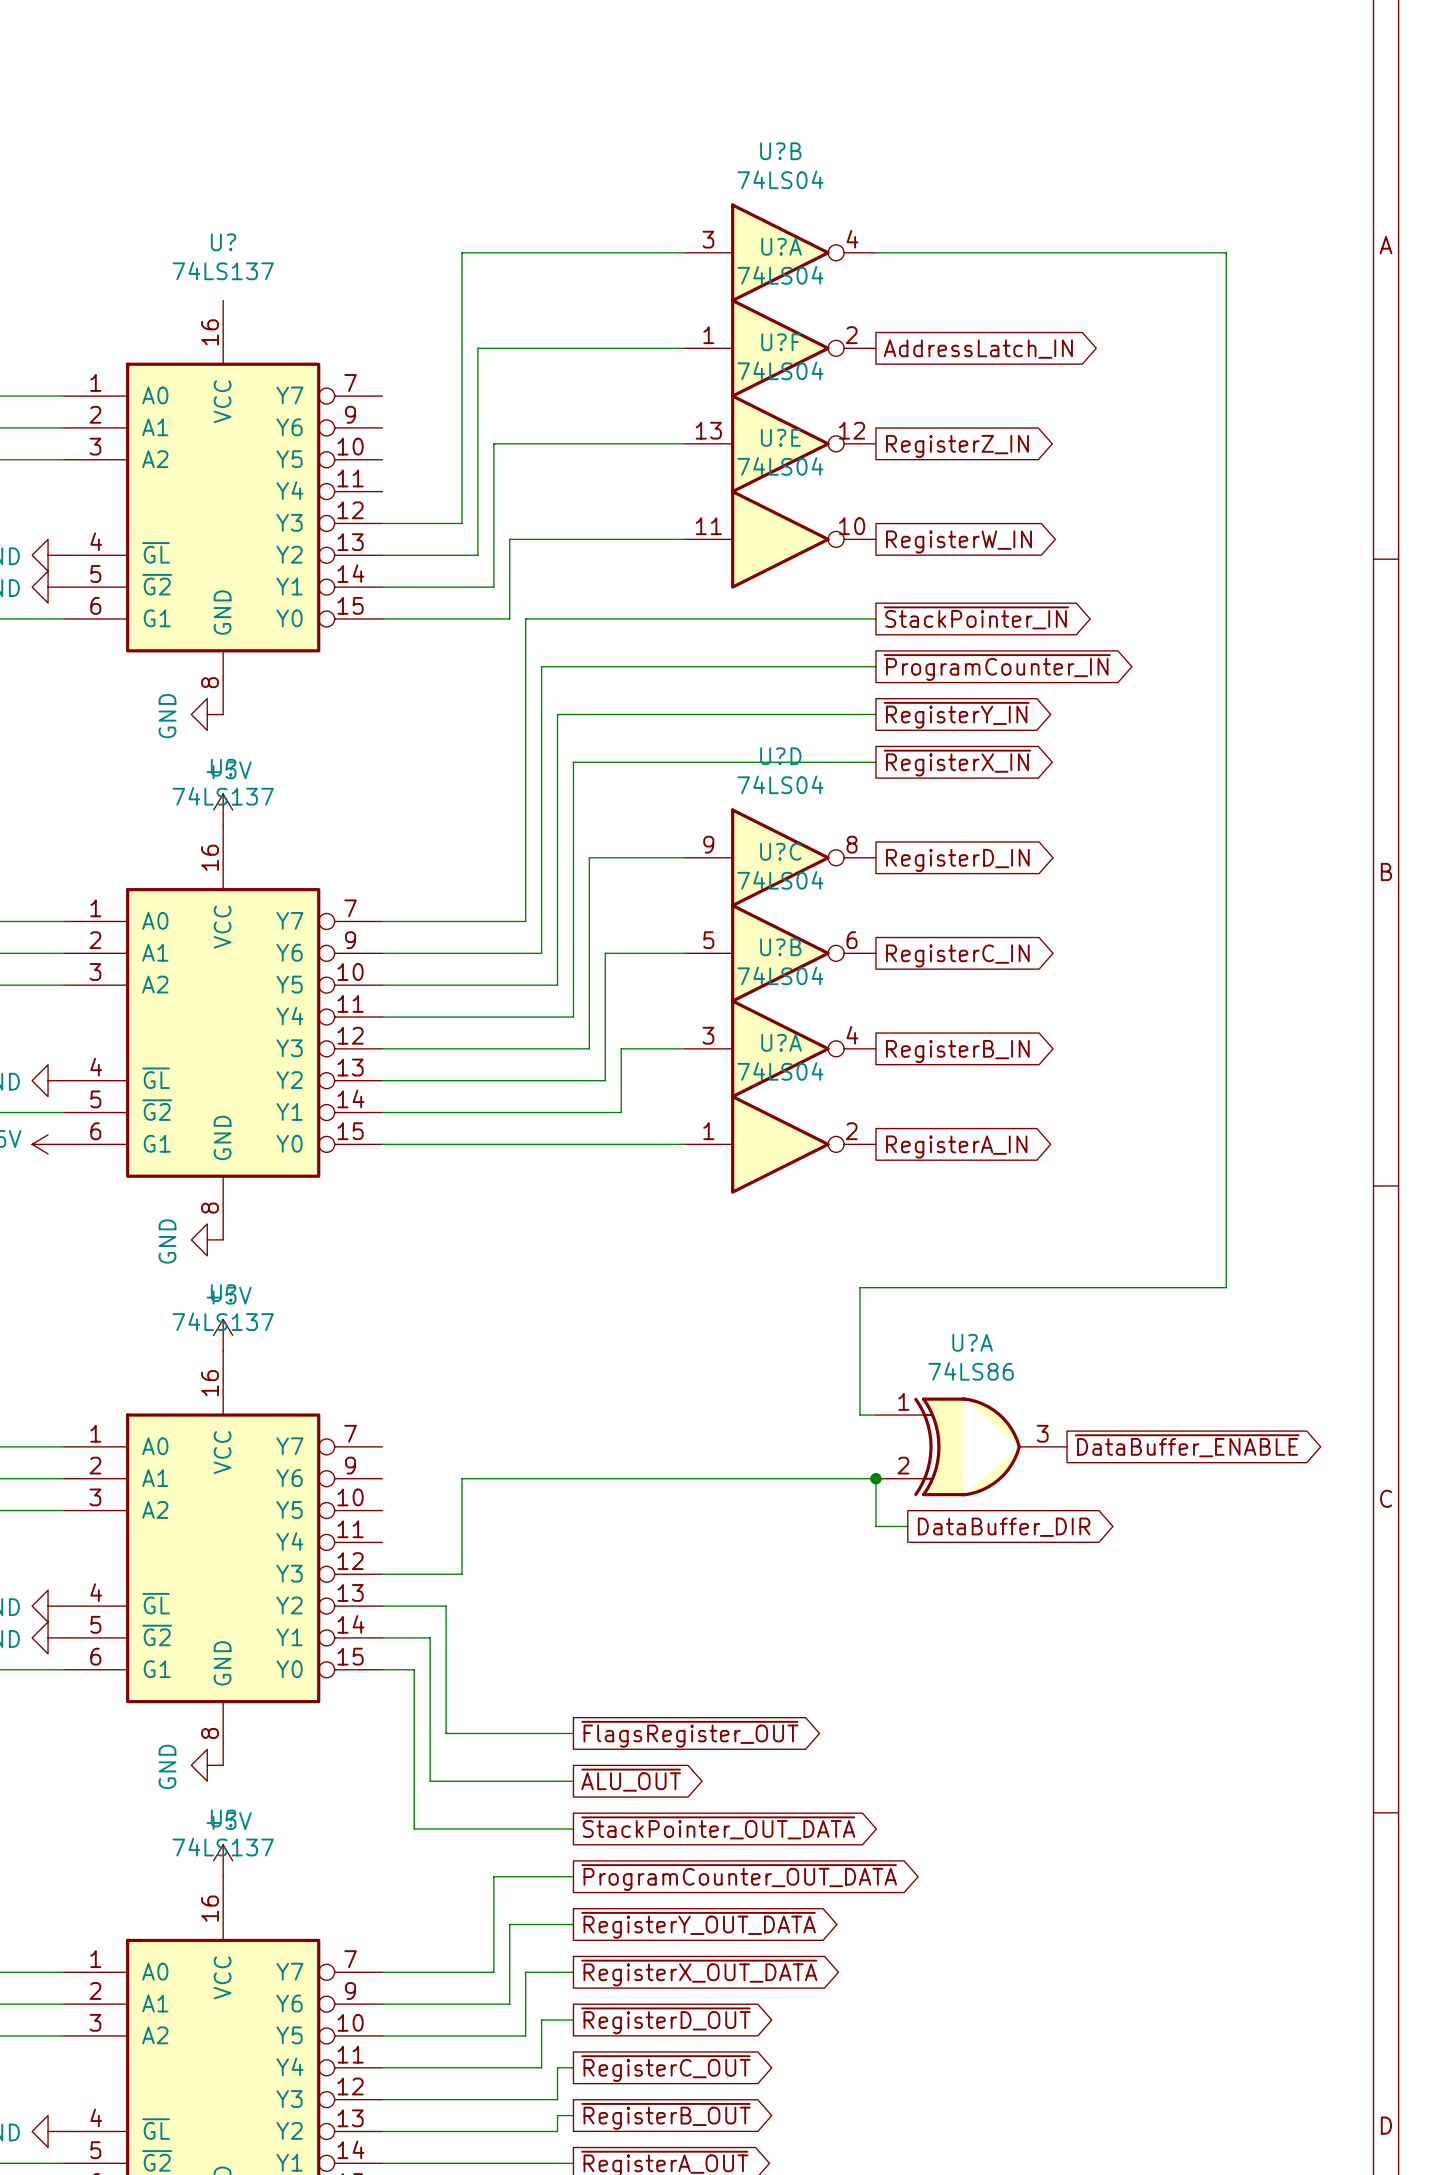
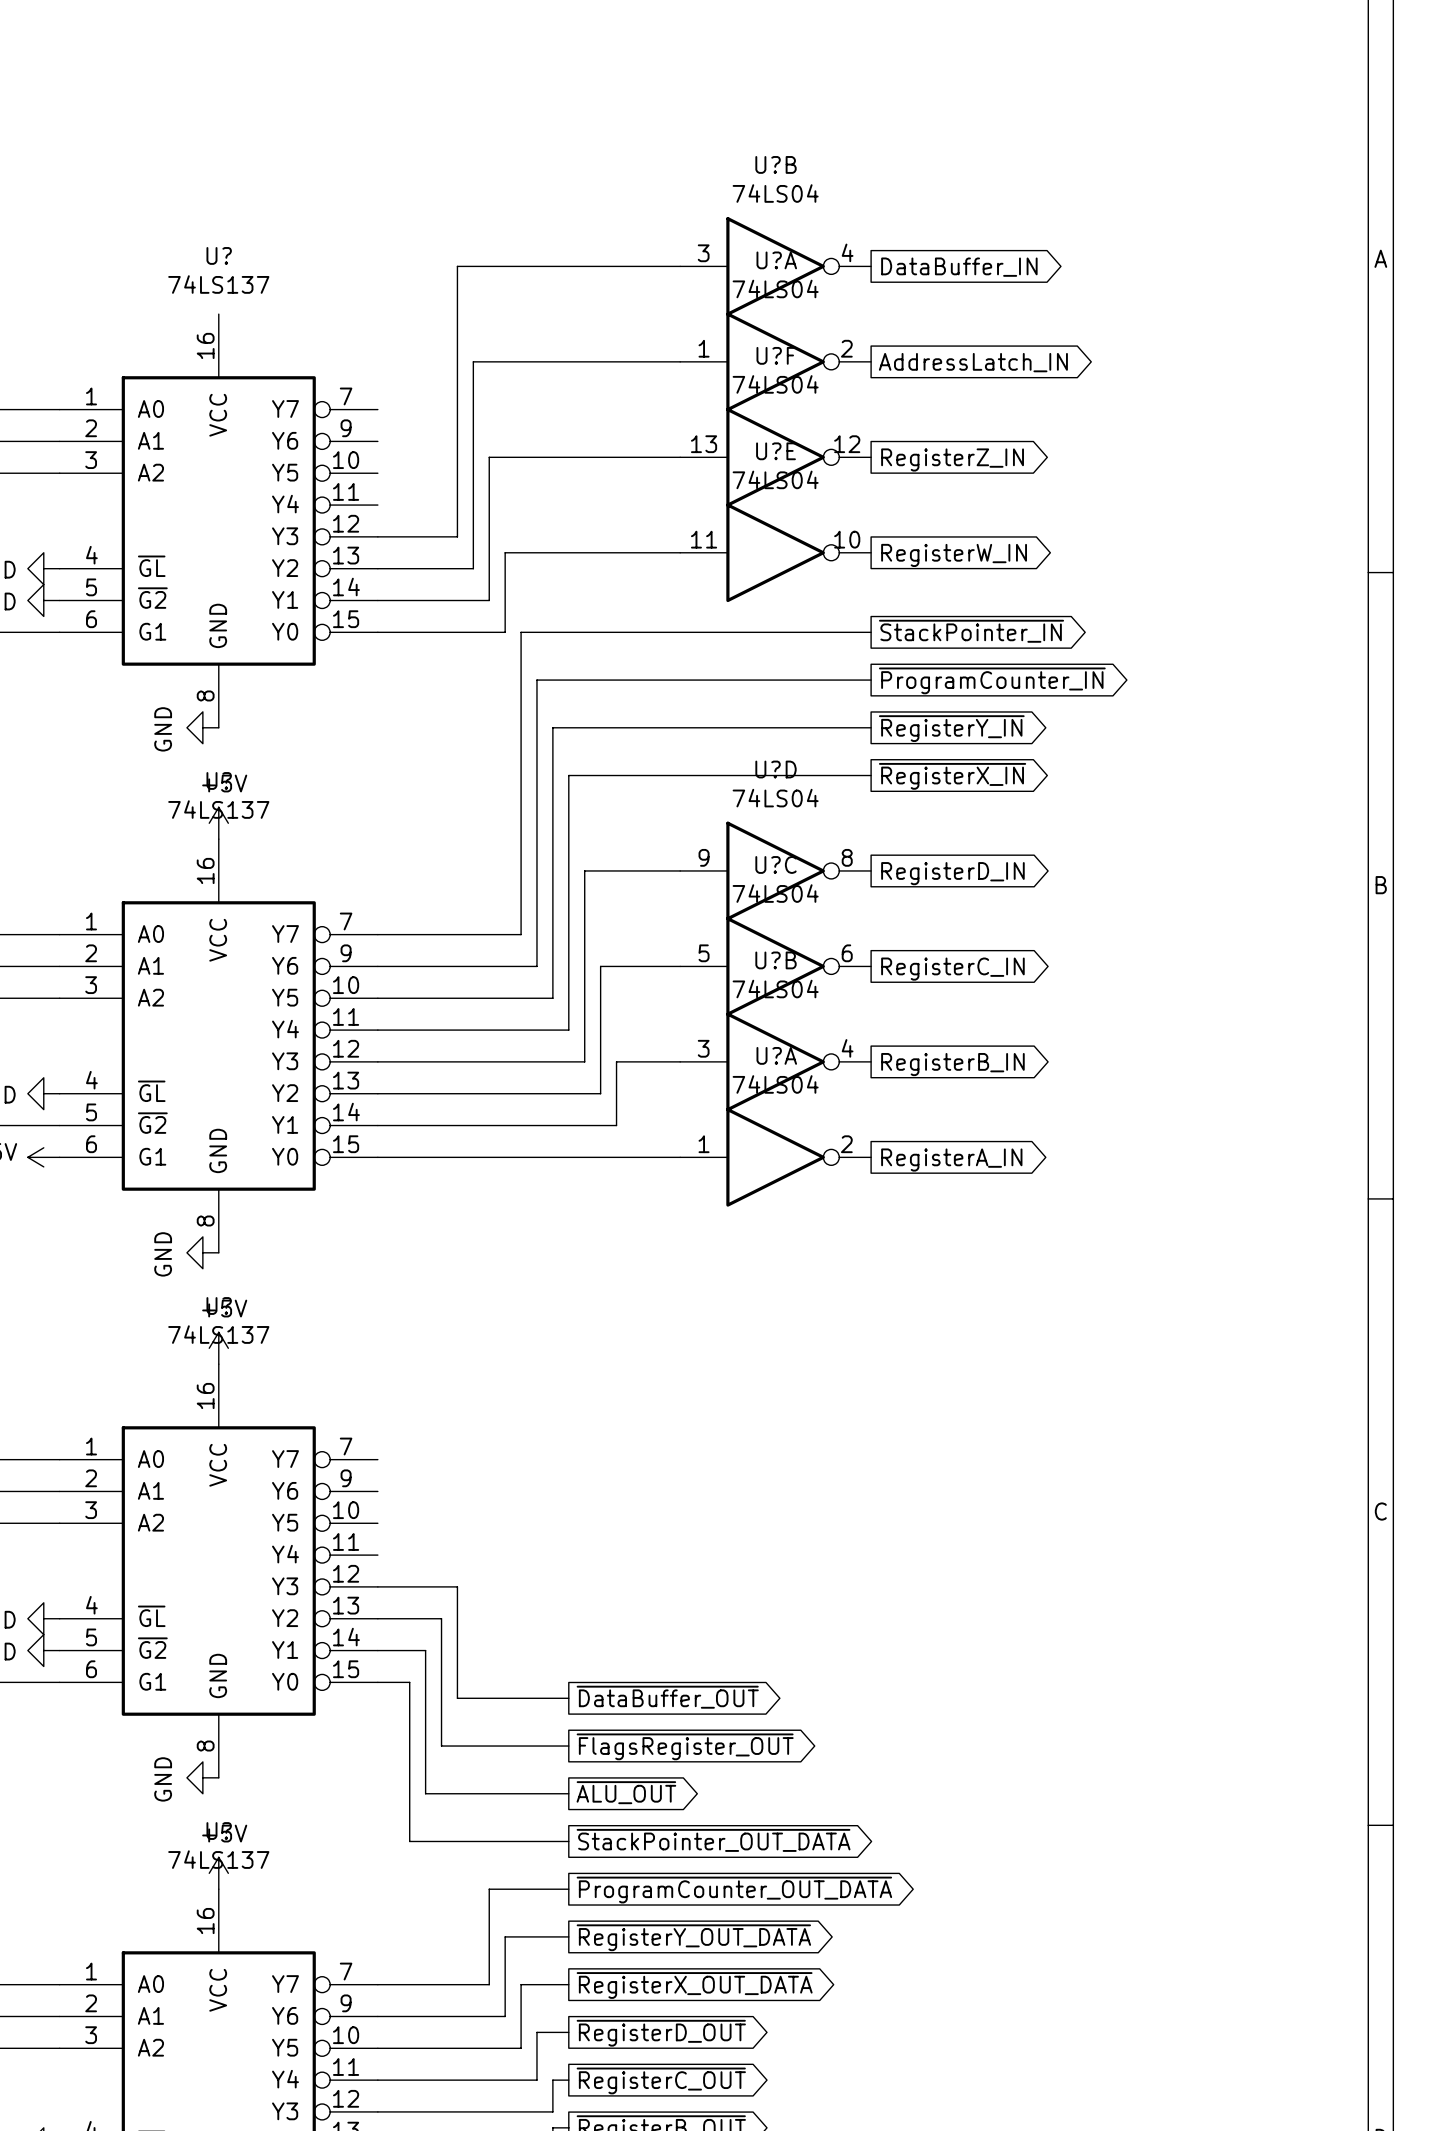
wire: (875, 252) (1226, 252) (1226, 1287) (860, 1287) (860, 1415) (875, 1415) -> none
global label: none -> DataBuffer_IN (959, 267)
global label: ~{DataBuffer_ENABLE} (1187, 1445) -> none
U?A: 74LS86 (971, 1446) -> none
junction: (875, 1478) -> none
wire: (907, 1526) (875, 1526) (875, 1478) (462, 1478) (462, 1574) -> (568, 1698) (457, 1698) (457, 1586)
global label: DataBuffer_DIR (1004, 1527) -> none
global label: none -> ~{DataBuffer_OUT} (667, 1697)

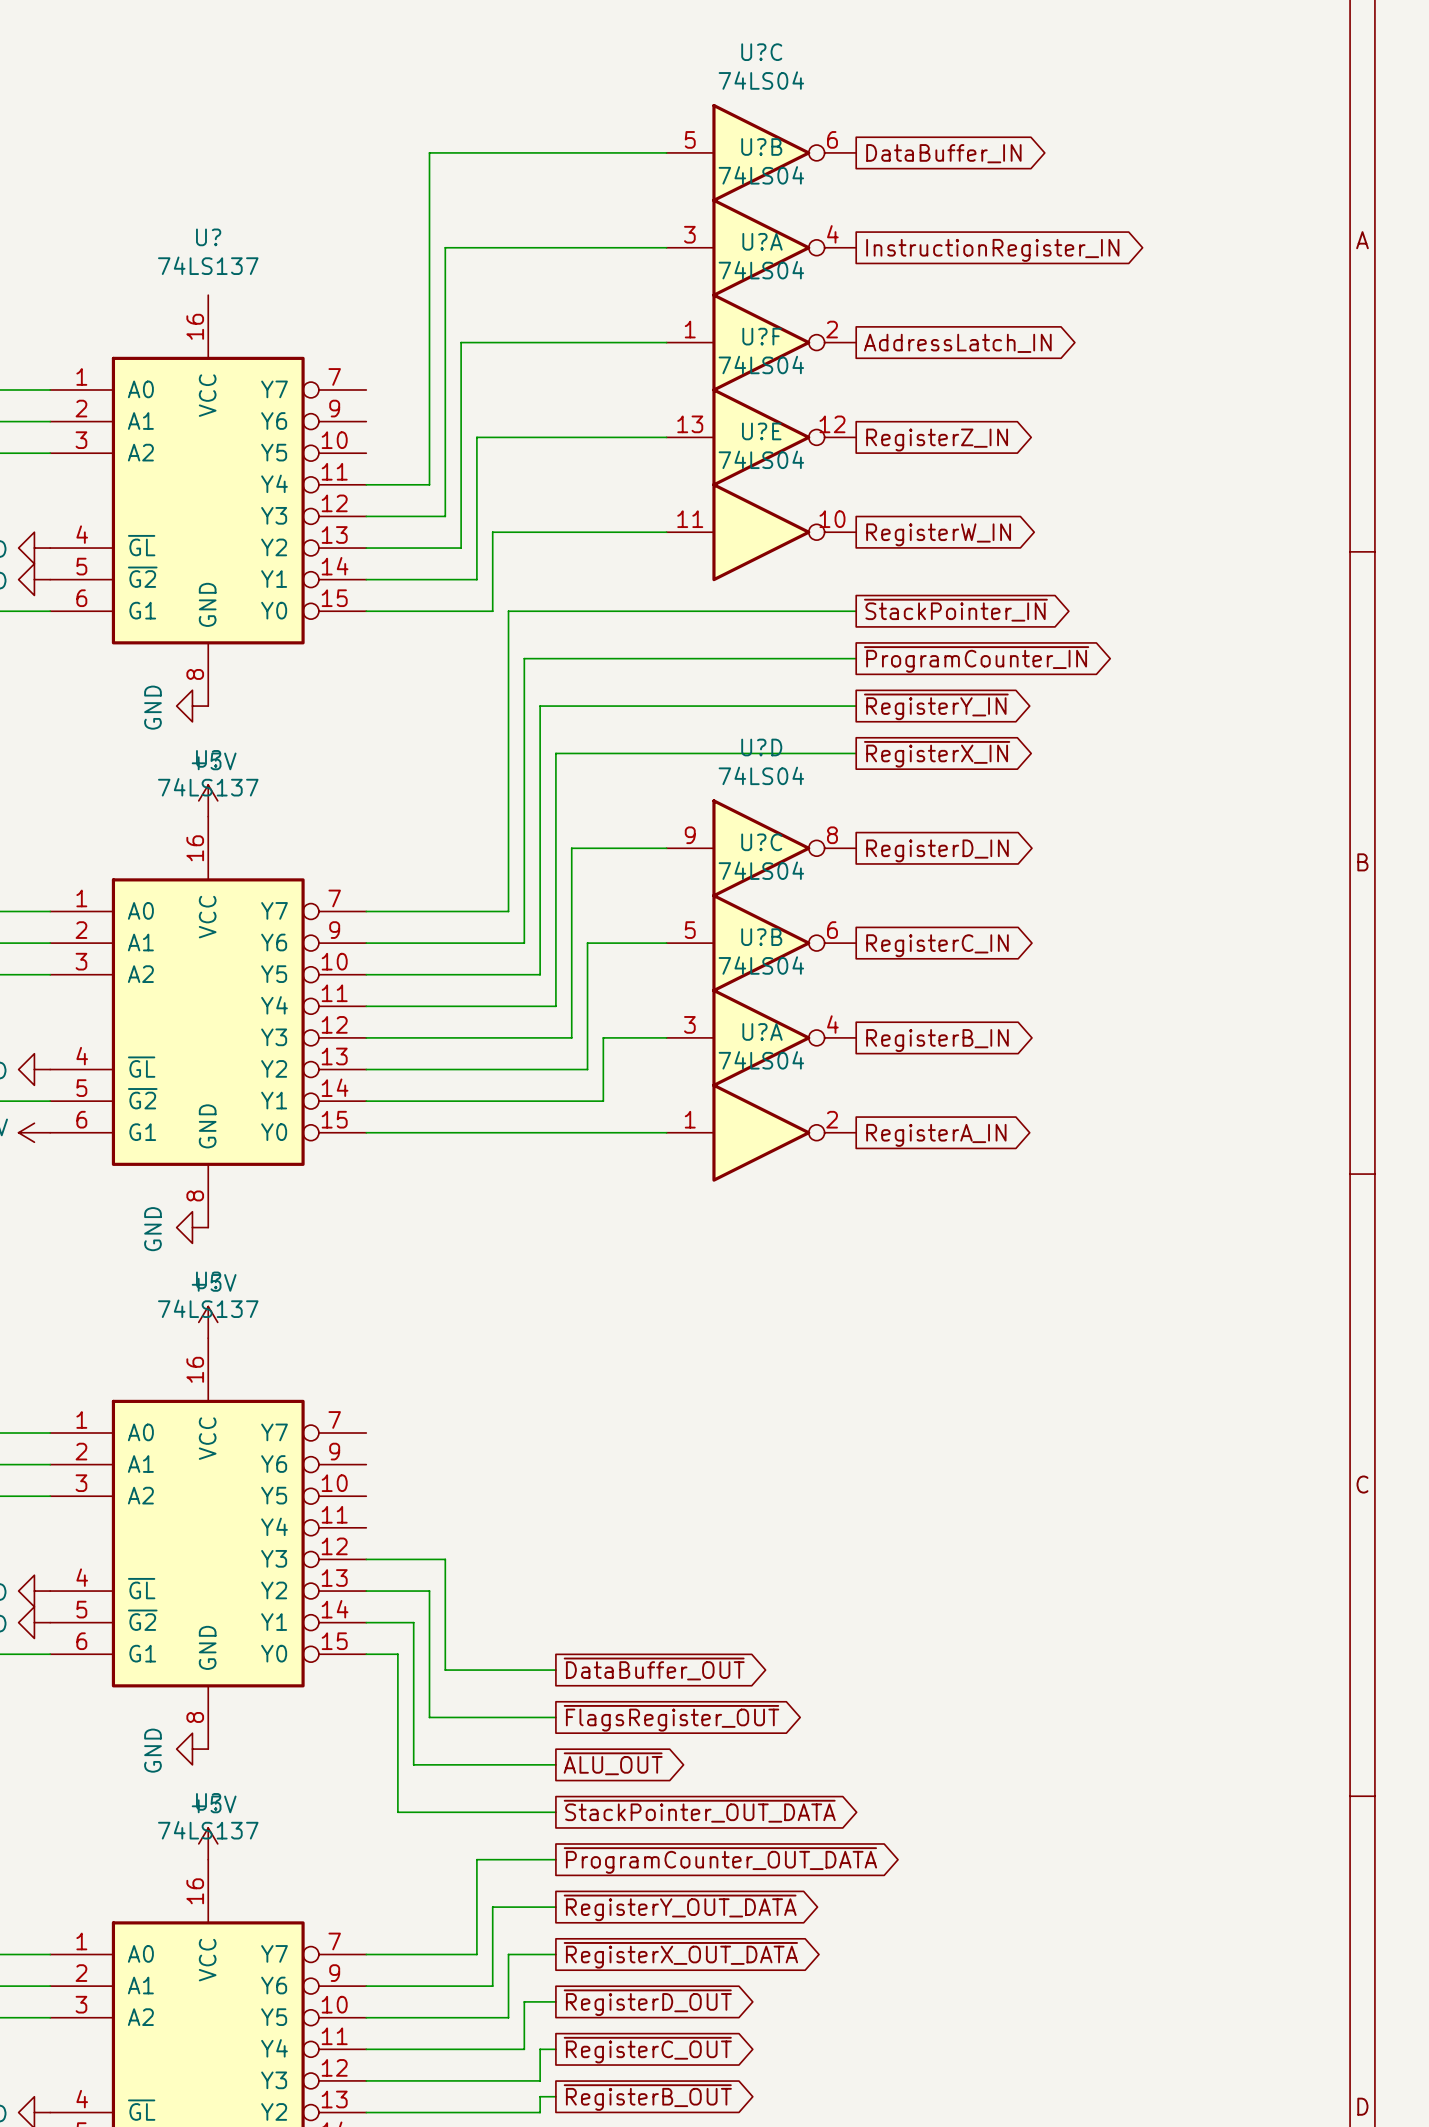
wire: none -> (666, 152) (429, 152) (429, 484) (366, 484)
U?C: none -> 74LS04 (761, 152)
global label: none -> DataBuffer_IN (943, 153)
global label: DataBuffer_IN (959, 267) -> InstructionRegister_IN (992, 250)

